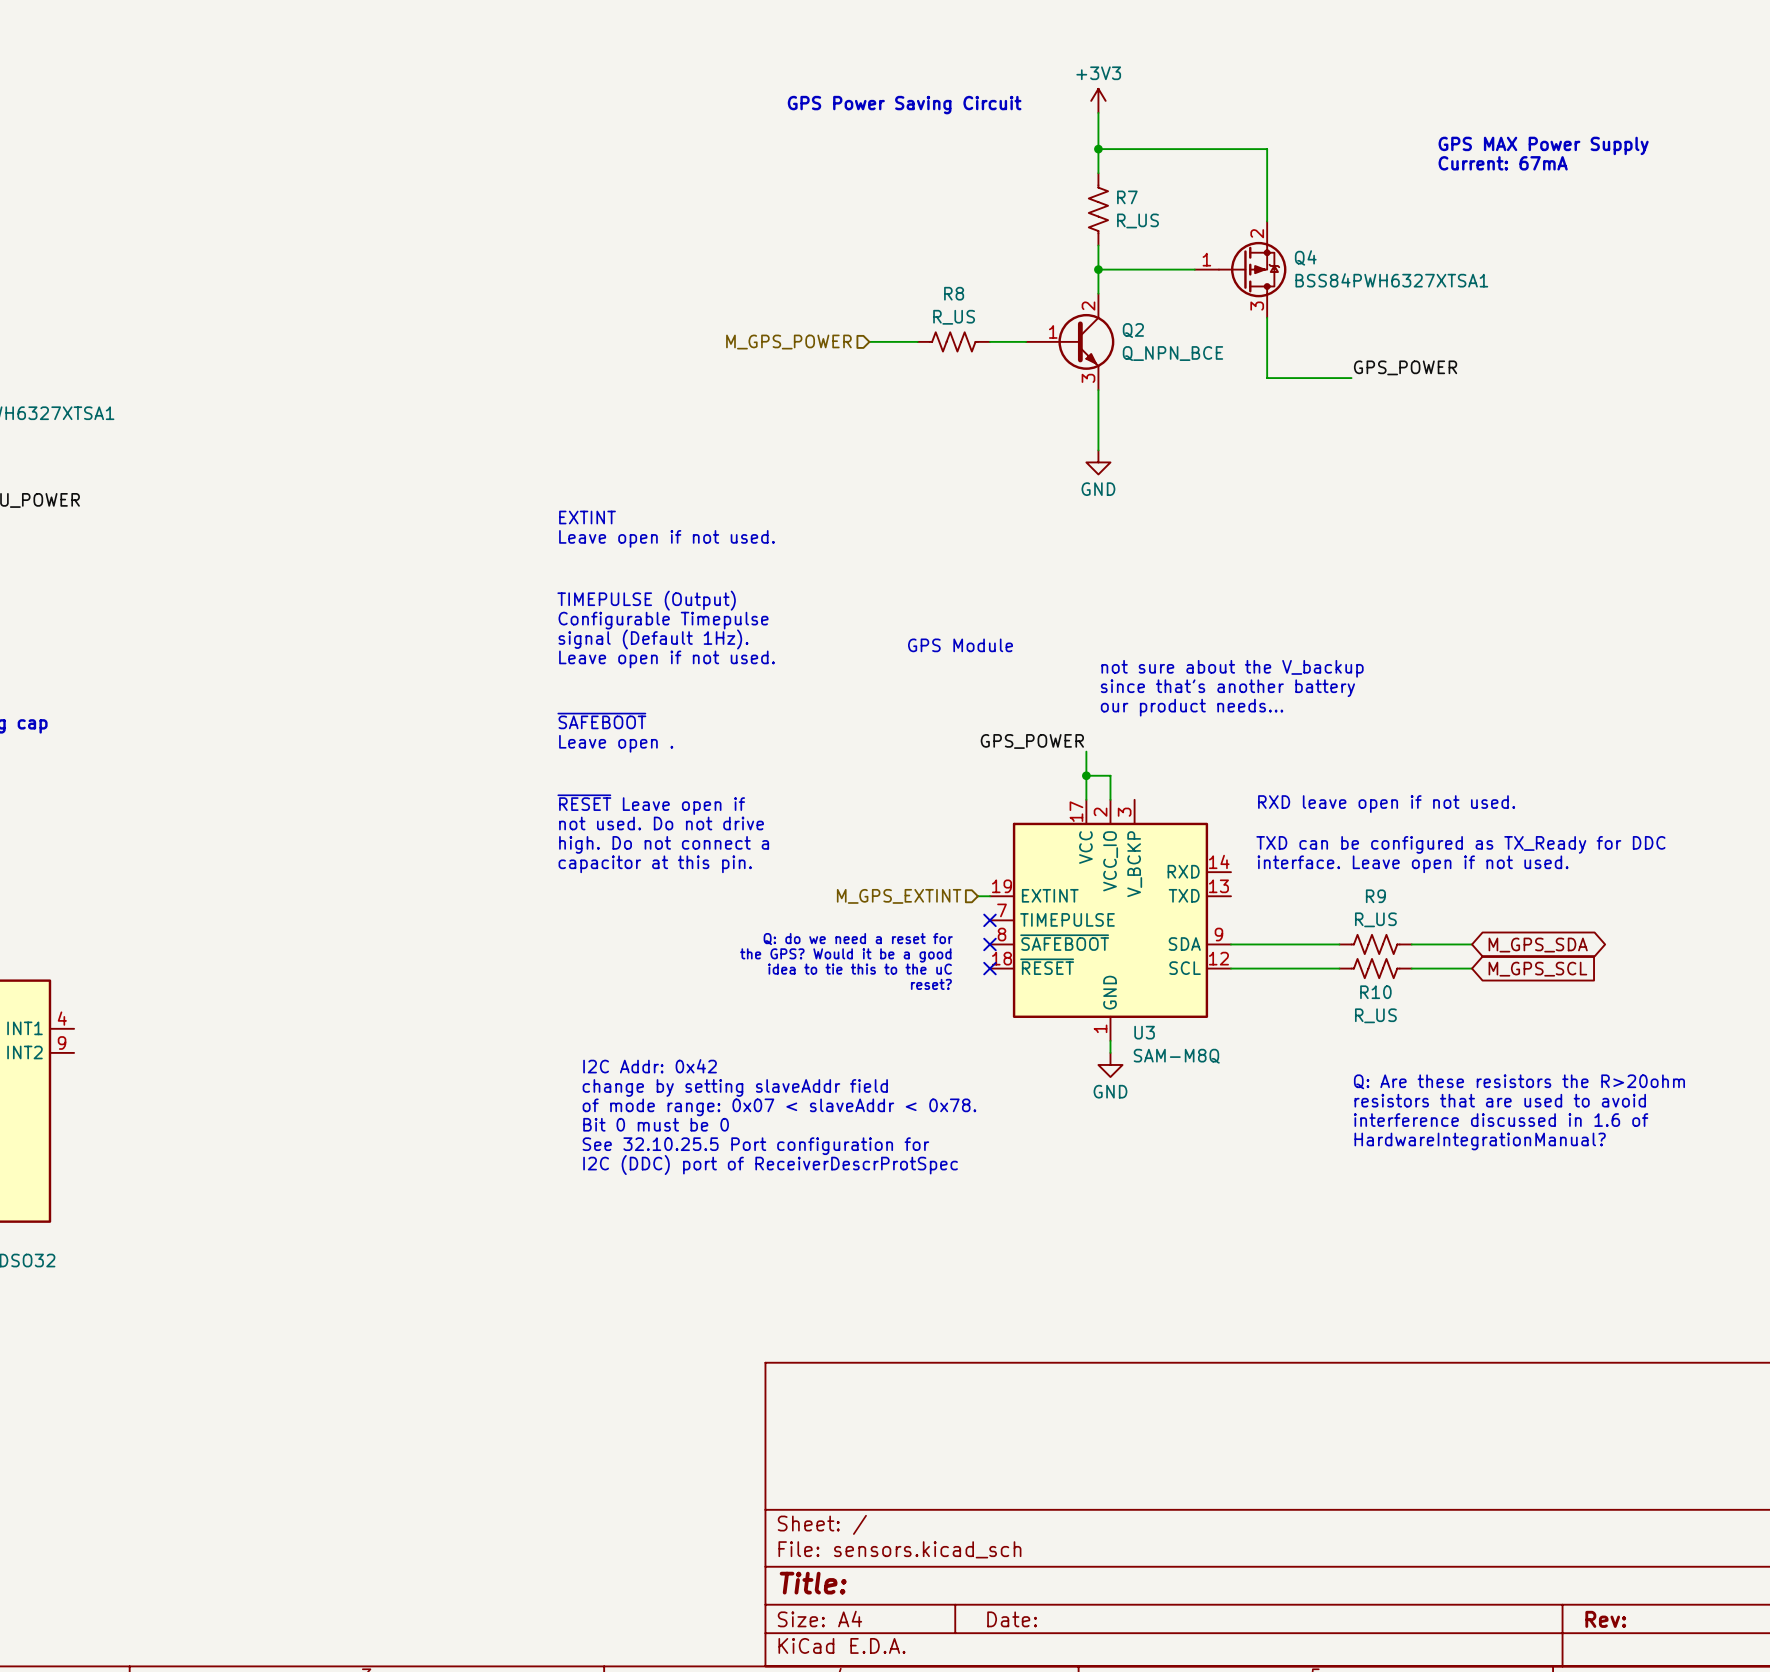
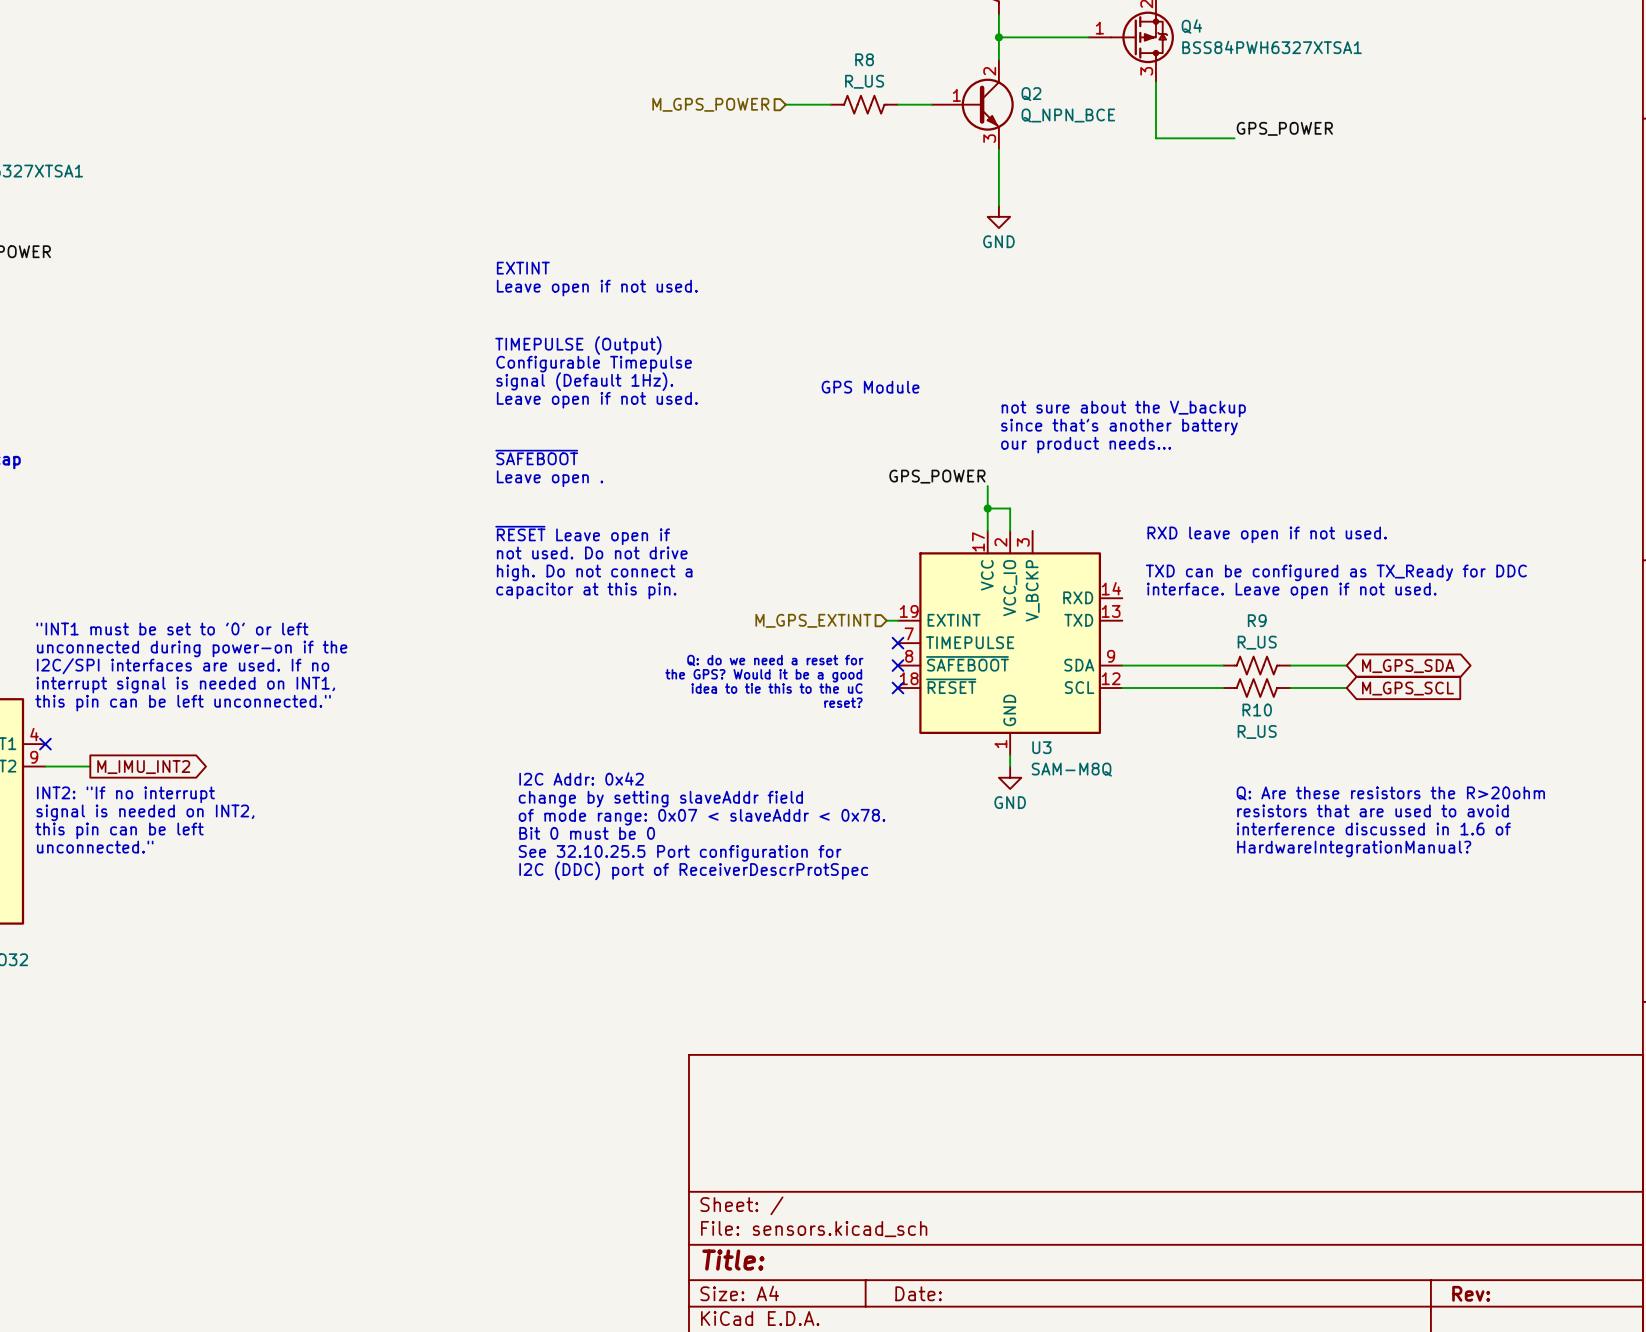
text: none -> "INT1 must be set to '0' or left (172, 629)
text: none -> unconnected during power-on if the (192, 648)
text: none -> I2C/SPI interfaces are used. If no (183, 666)
text: none -> interrupt signal is needed on INT1, (185, 685)
text: none -> this pin can be left unconnected." (183, 703)
no-connect mark: none -> (45, 744)
wire: none -> (45, 766) (90, 766)
global label: none -> M_IMU_INT2 (143, 767)
text: none -> INT2: "If no interrupt (125, 794)
text: none -> signal is needed on INT2, (145, 812)
text: none -> this pin can be left (119, 830)
text: none -> unconnected." (95, 847)

